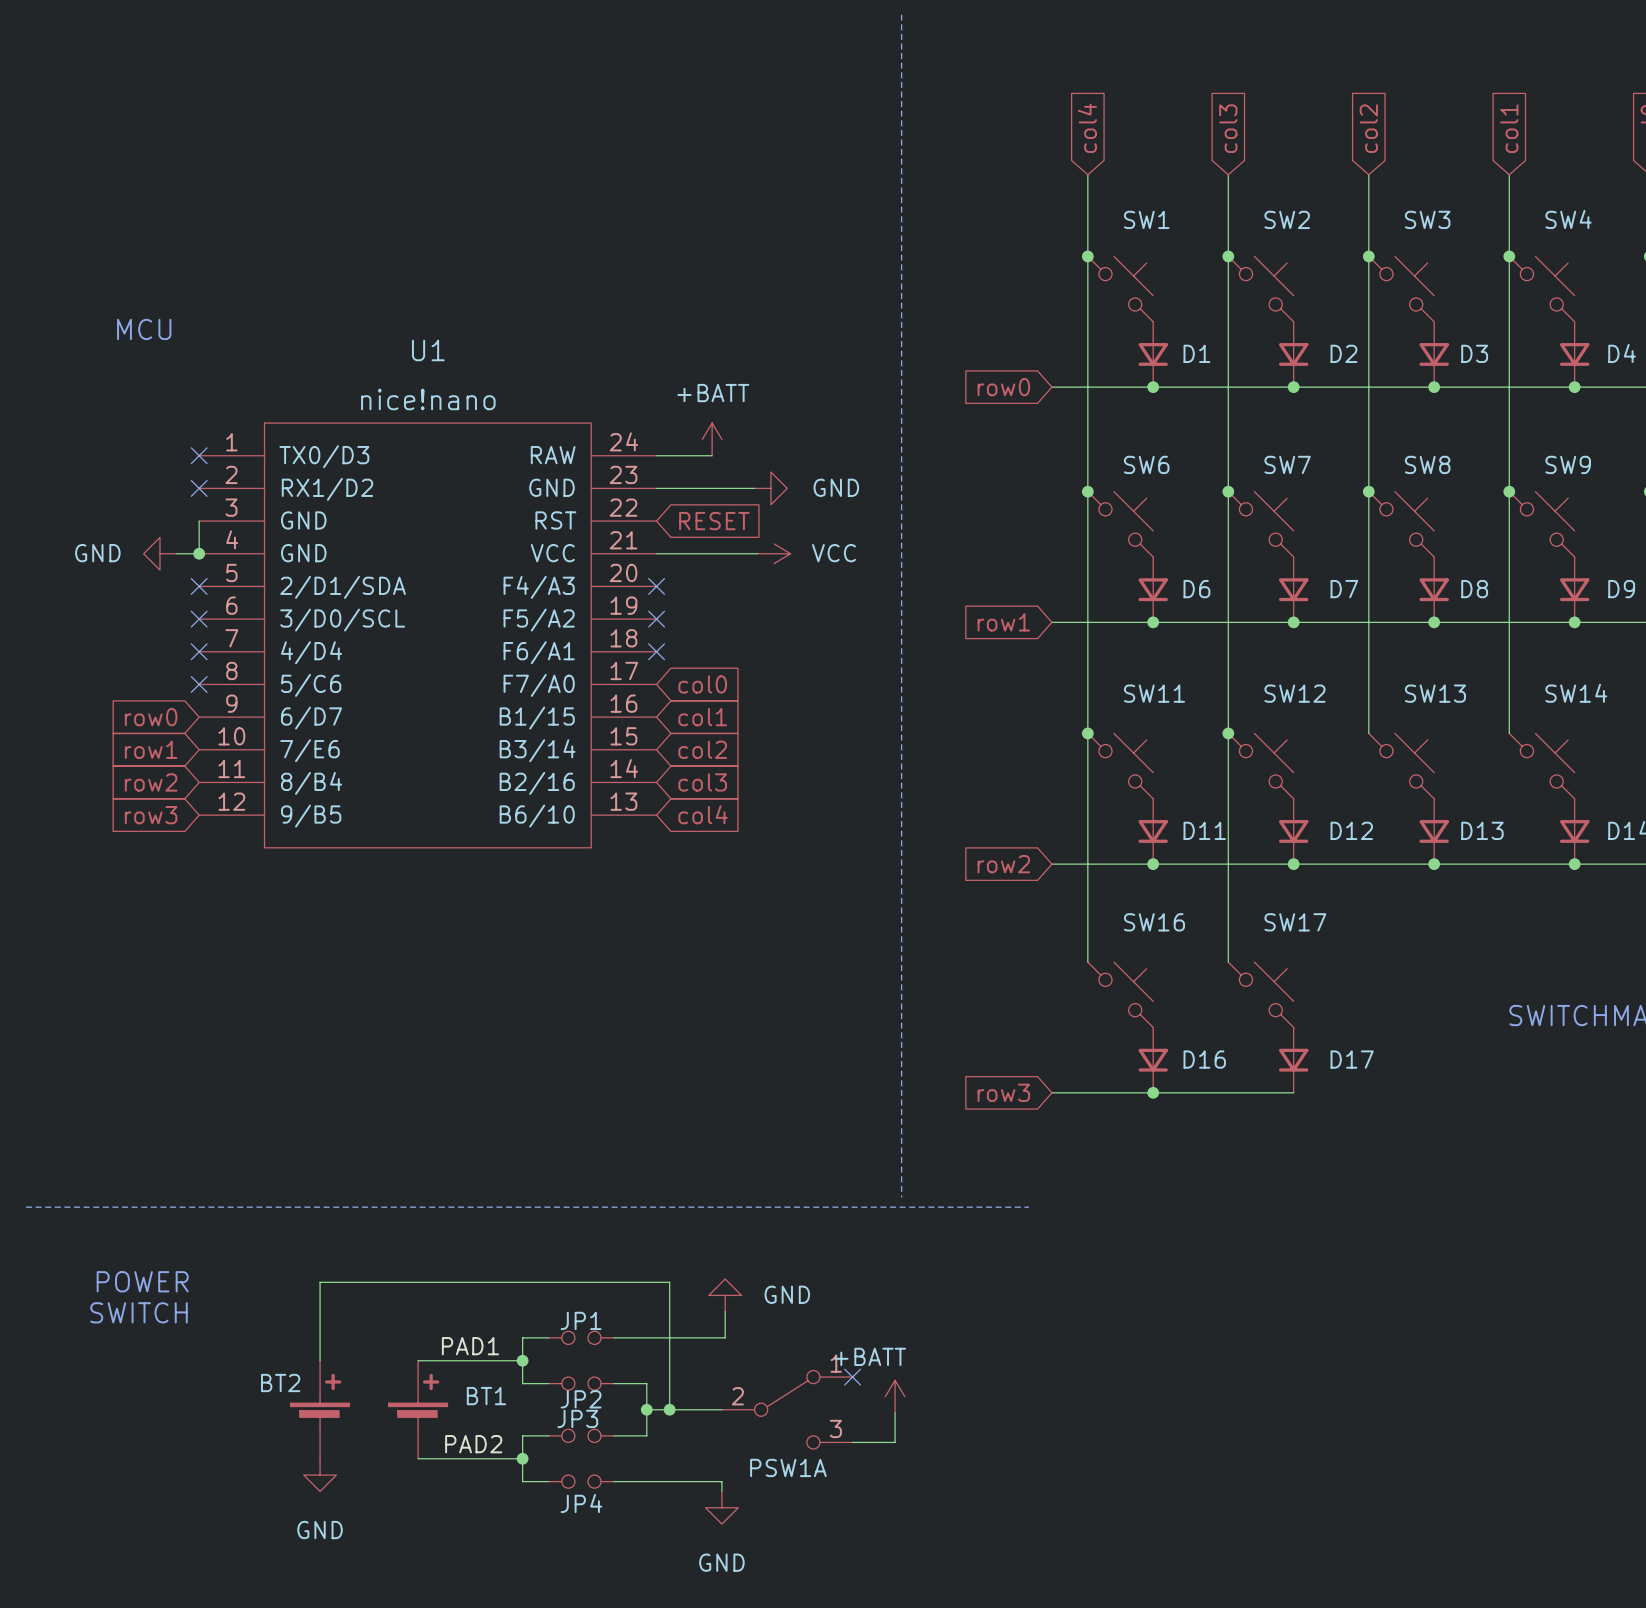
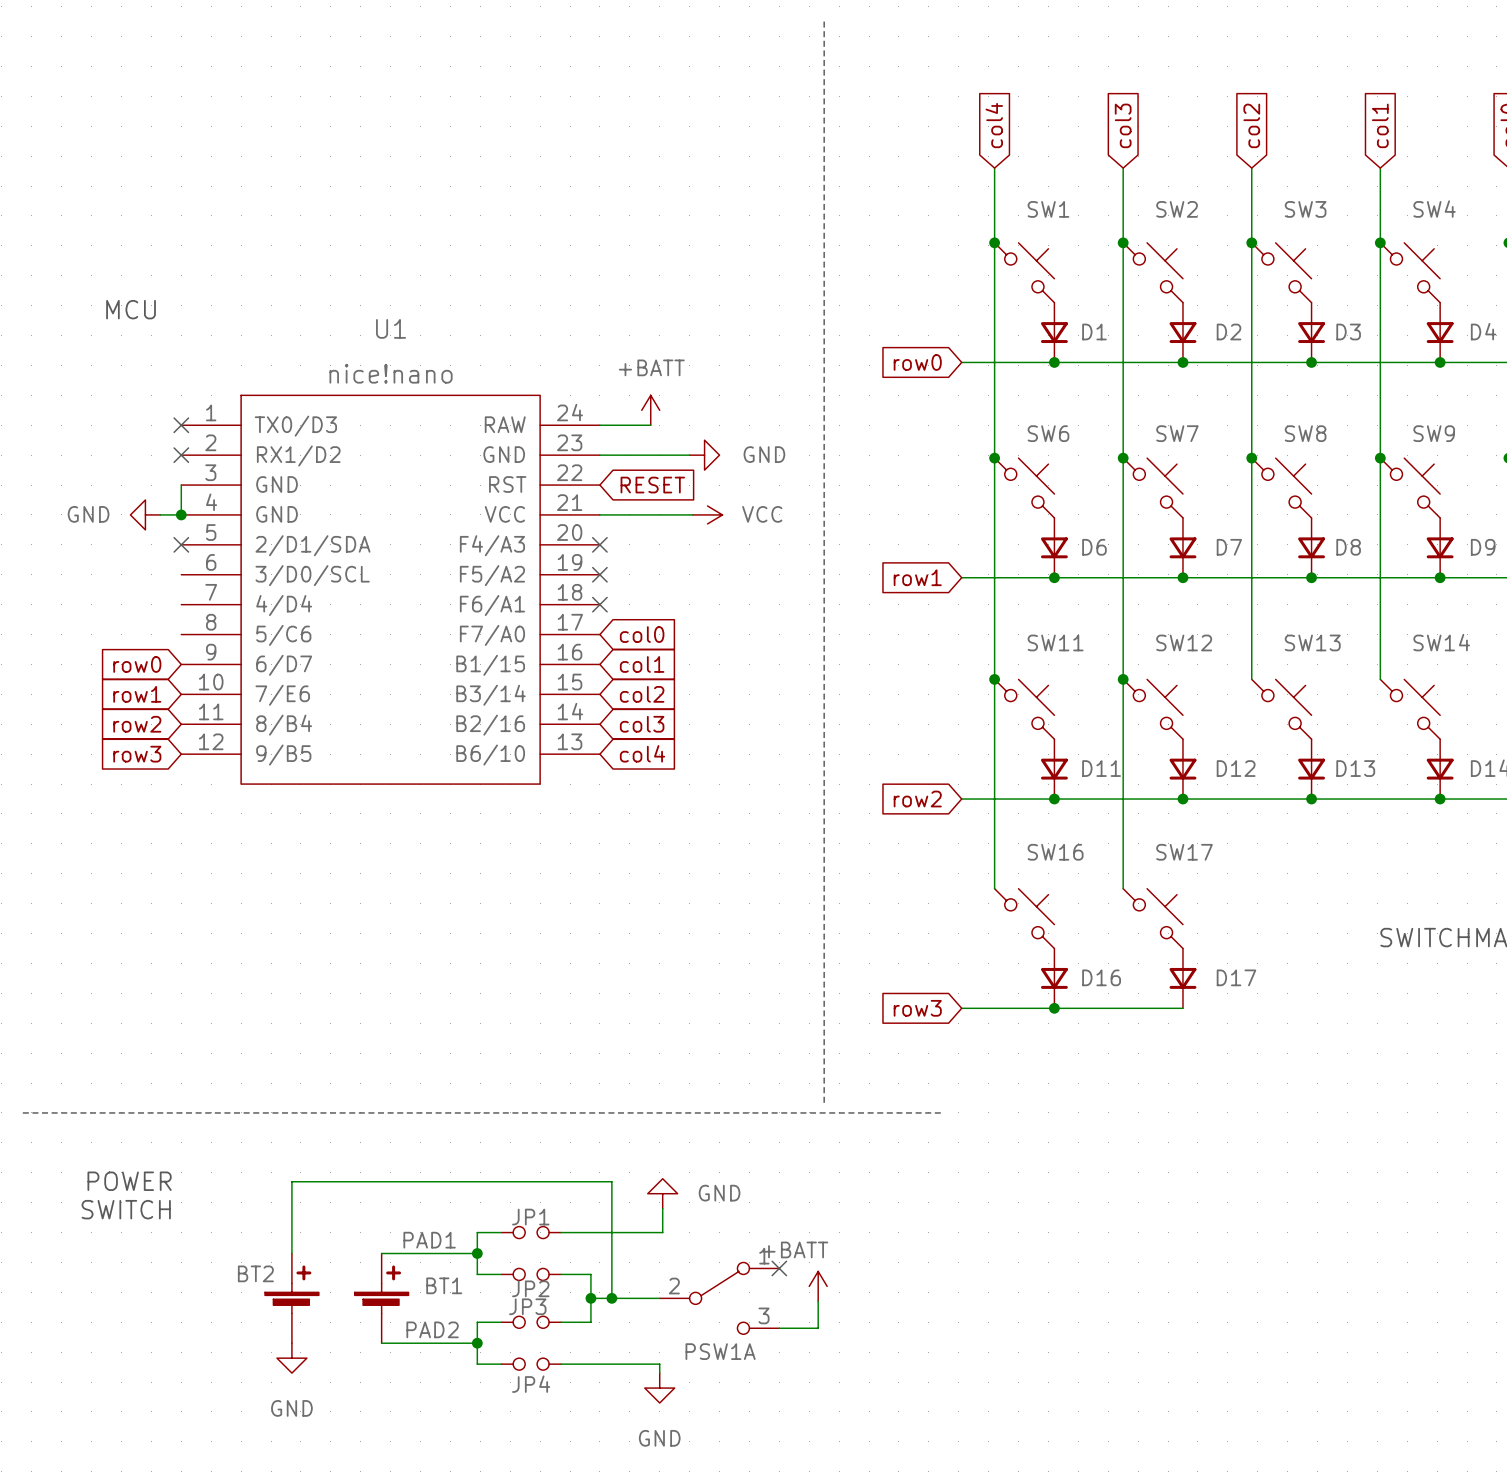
no-connect mark: (199, 619) -> none
no-connect mark: (199, 651) -> none
no-connect mark: (199, 684) -> none

